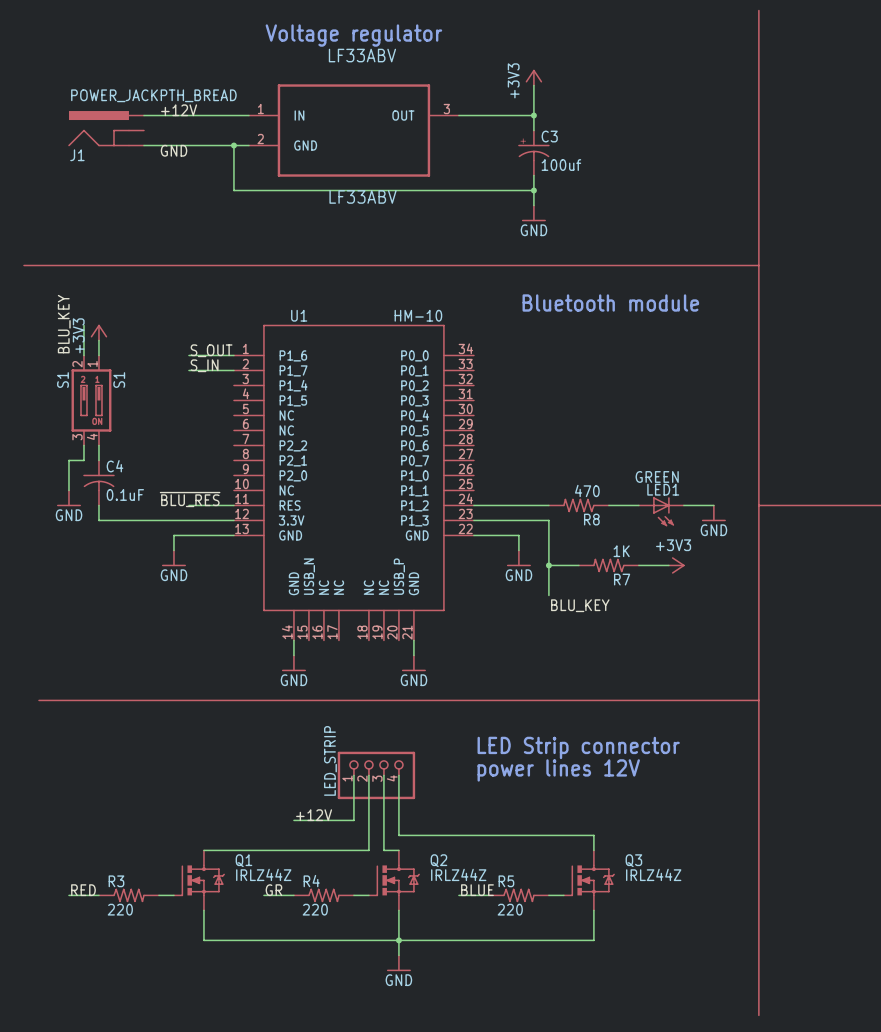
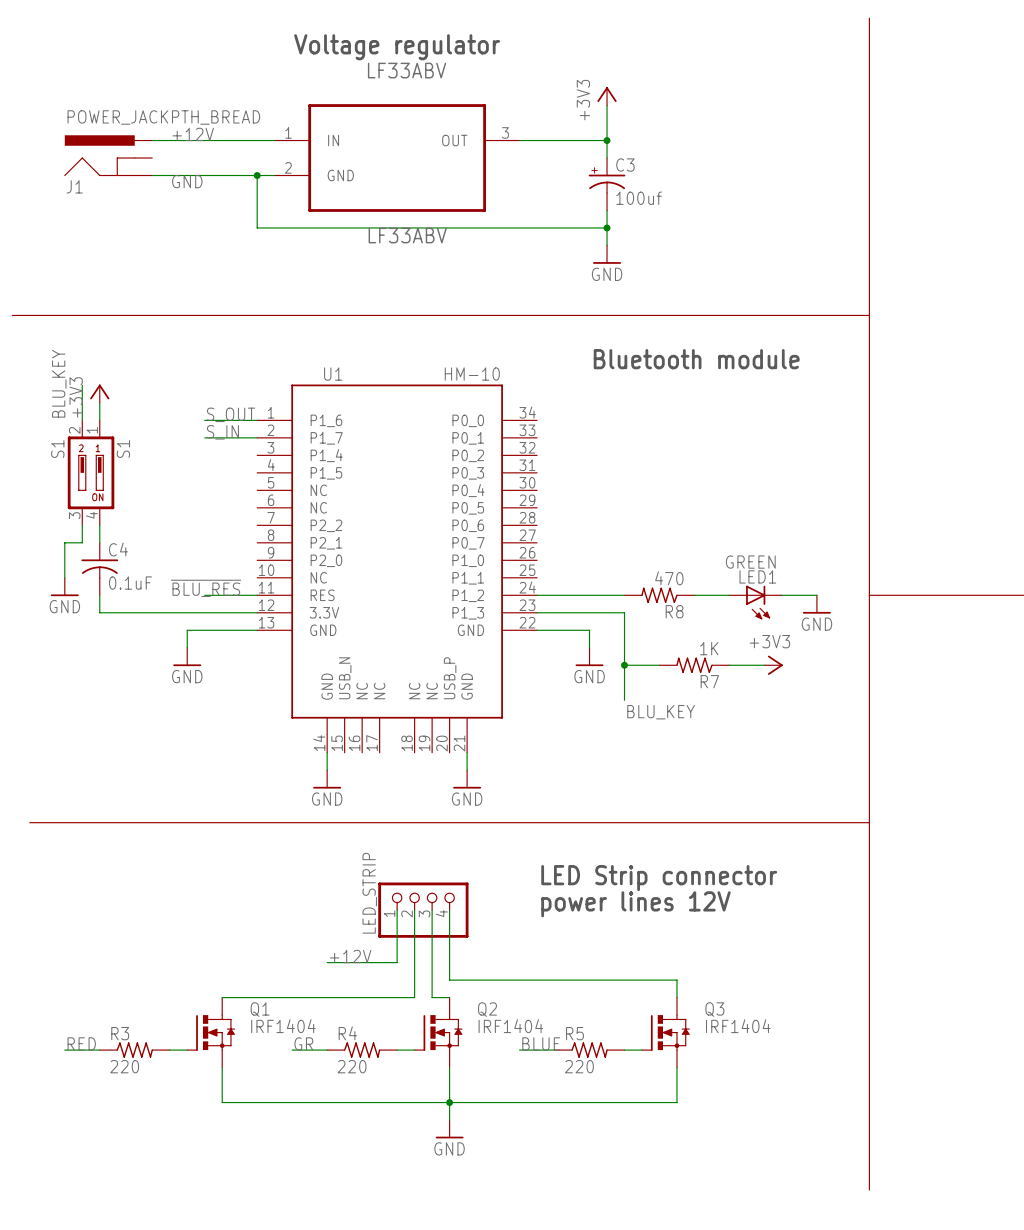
Q1 symbol: [173, 850, 225, 911] -> [186, 997, 235, 1068]
Q2 symbol: [368, 850, 420, 911] -> [414, 997, 463, 1068]
Q3 symbol: [563, 850, 615, 911] -> [641, 997, 690, 1068]
Q1 value: IRLZ44Z (263, 874) -> IRF1404 (283, 1026)
Q2 value: IRLZ44Z (458, 874) -> IRF1404 (510, 1026)
Q3 value: IRLZ44Z (653, 874) -> IRF1404 (738, 1026)

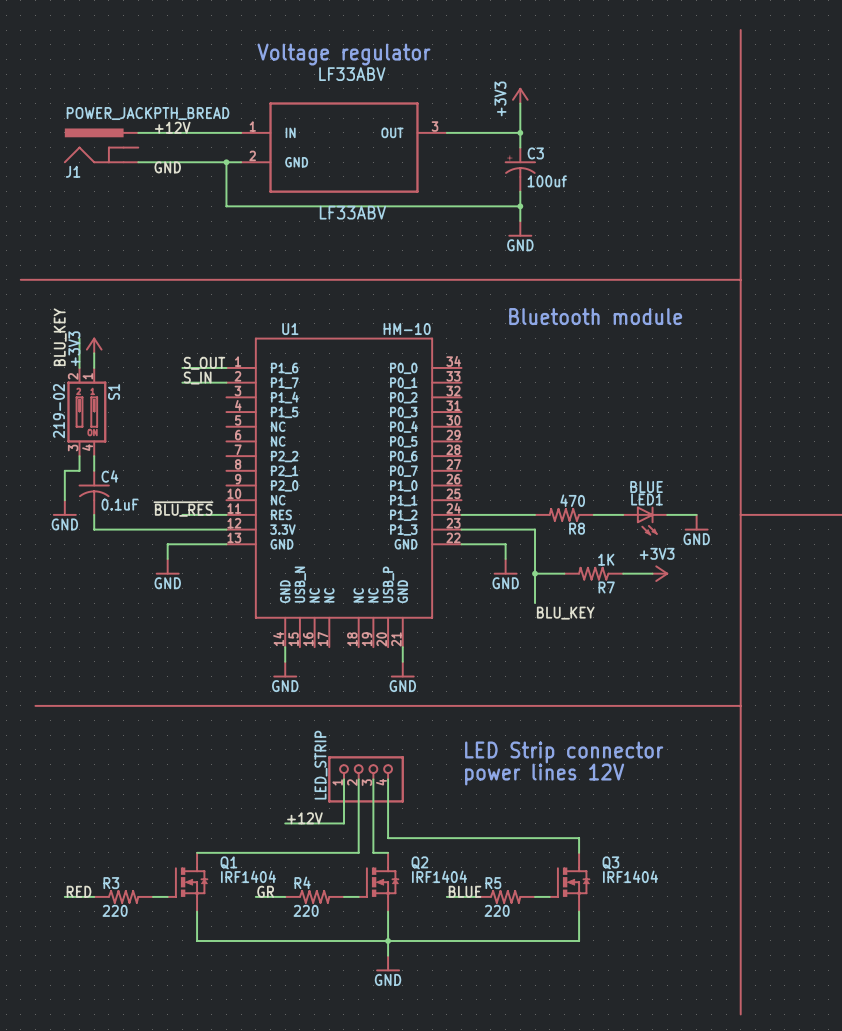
S1 value: S1 (57, 449) -> 219-02 (58, 411)
LED1 value: GREEN (750, 562) -> BLUE (646, 486)

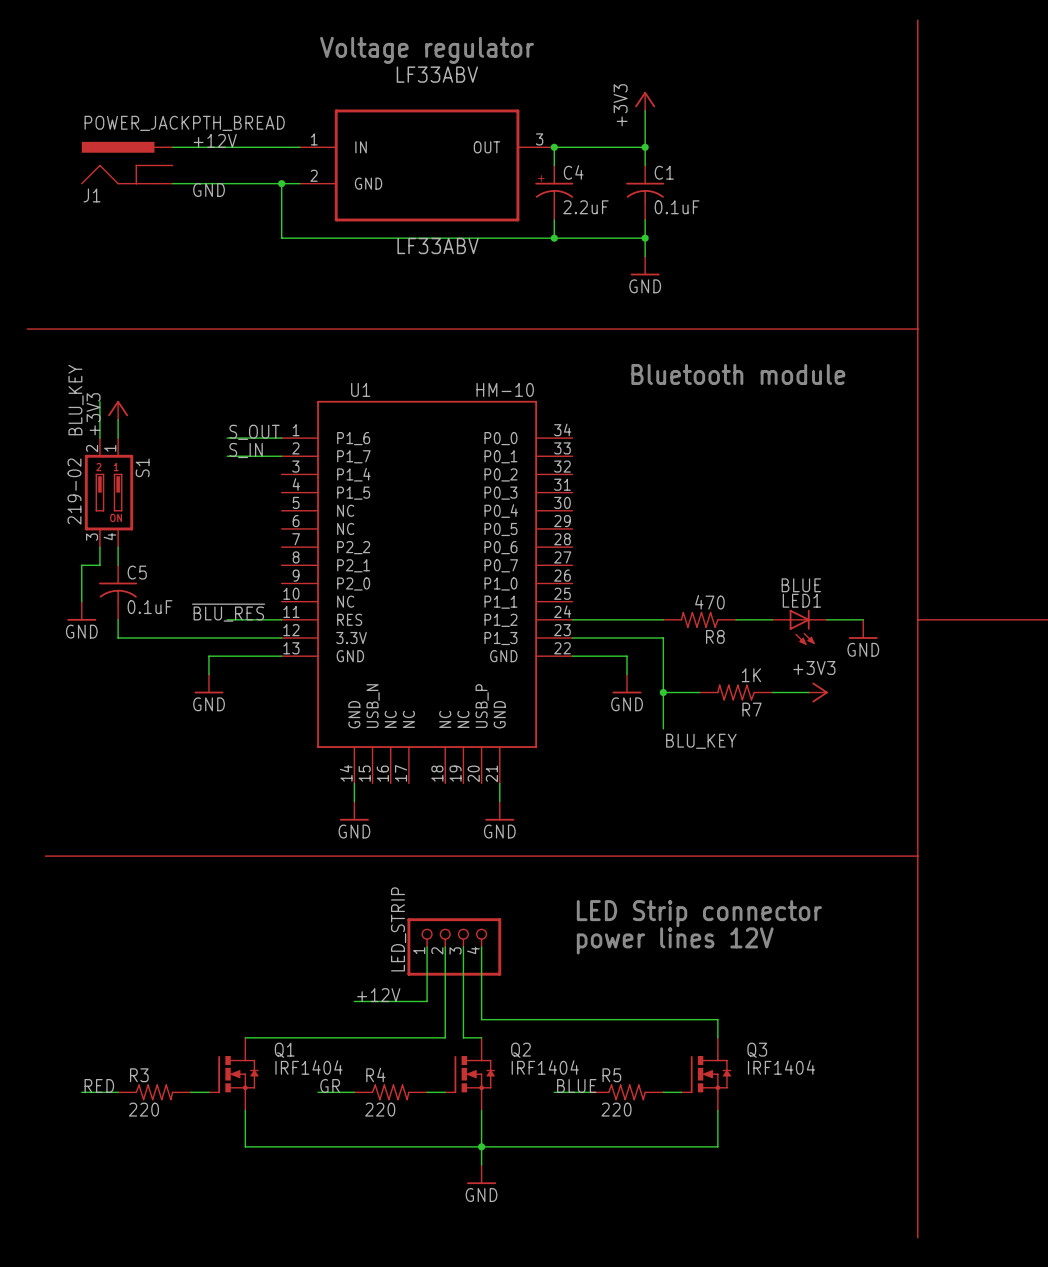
wire: none -> (554, 147) (554, 165)
junction: none -> (554, 147)
C4: none -> 2.2uF (554, 192)
C3: 100uf (520, 169) -> none
C1: none -> 0.1uF (645, 192)
wire: none -> (554, 219) (554, 238)
junction: none -> (554, 238)
C4 name: C4 (109, 476) -> C5 (137, 572)

